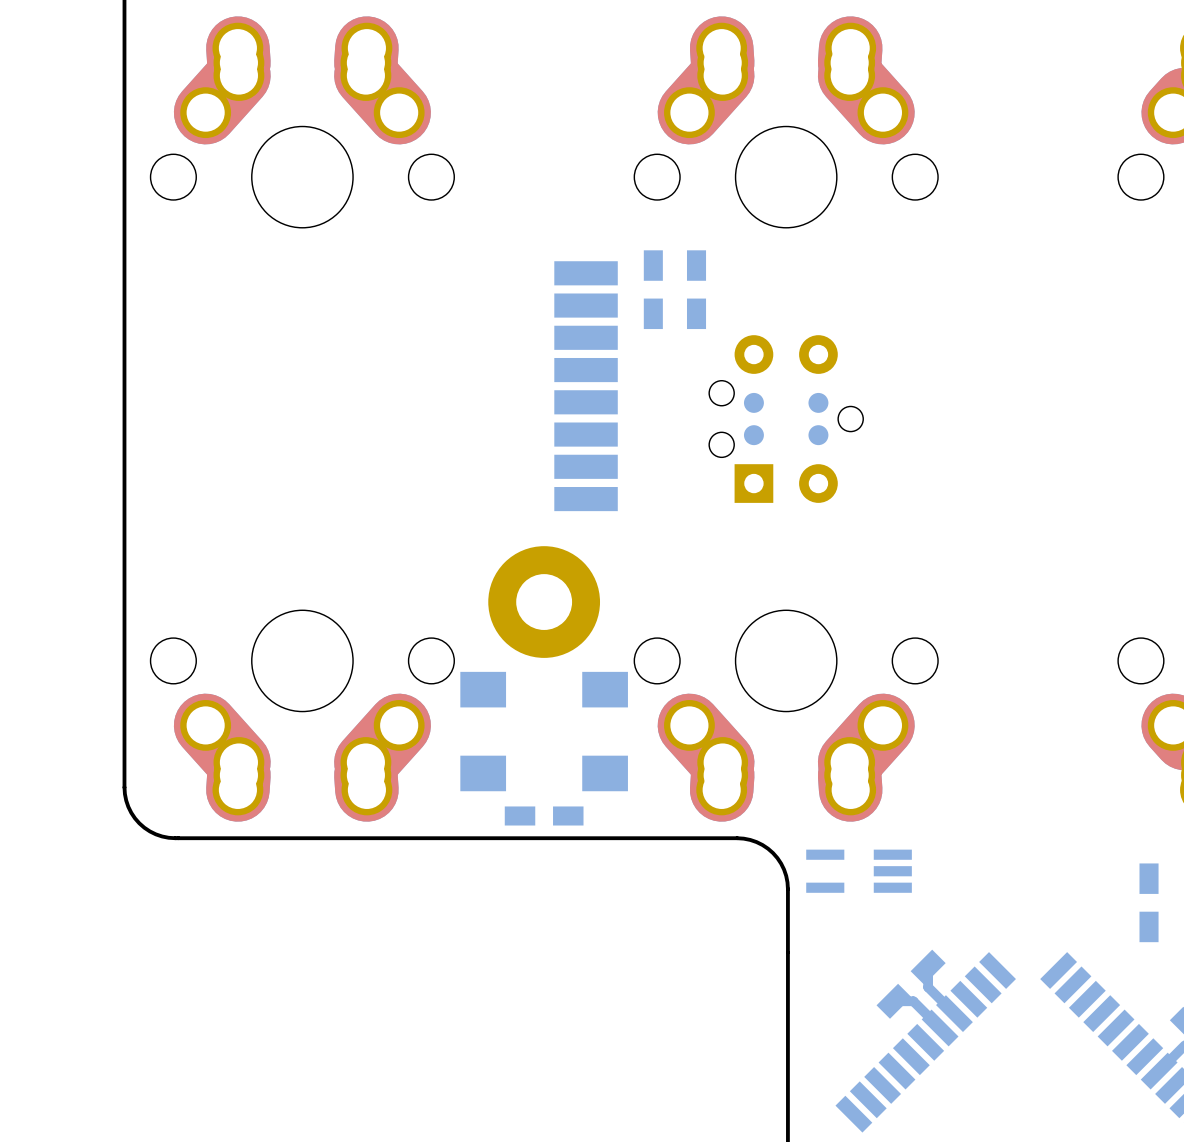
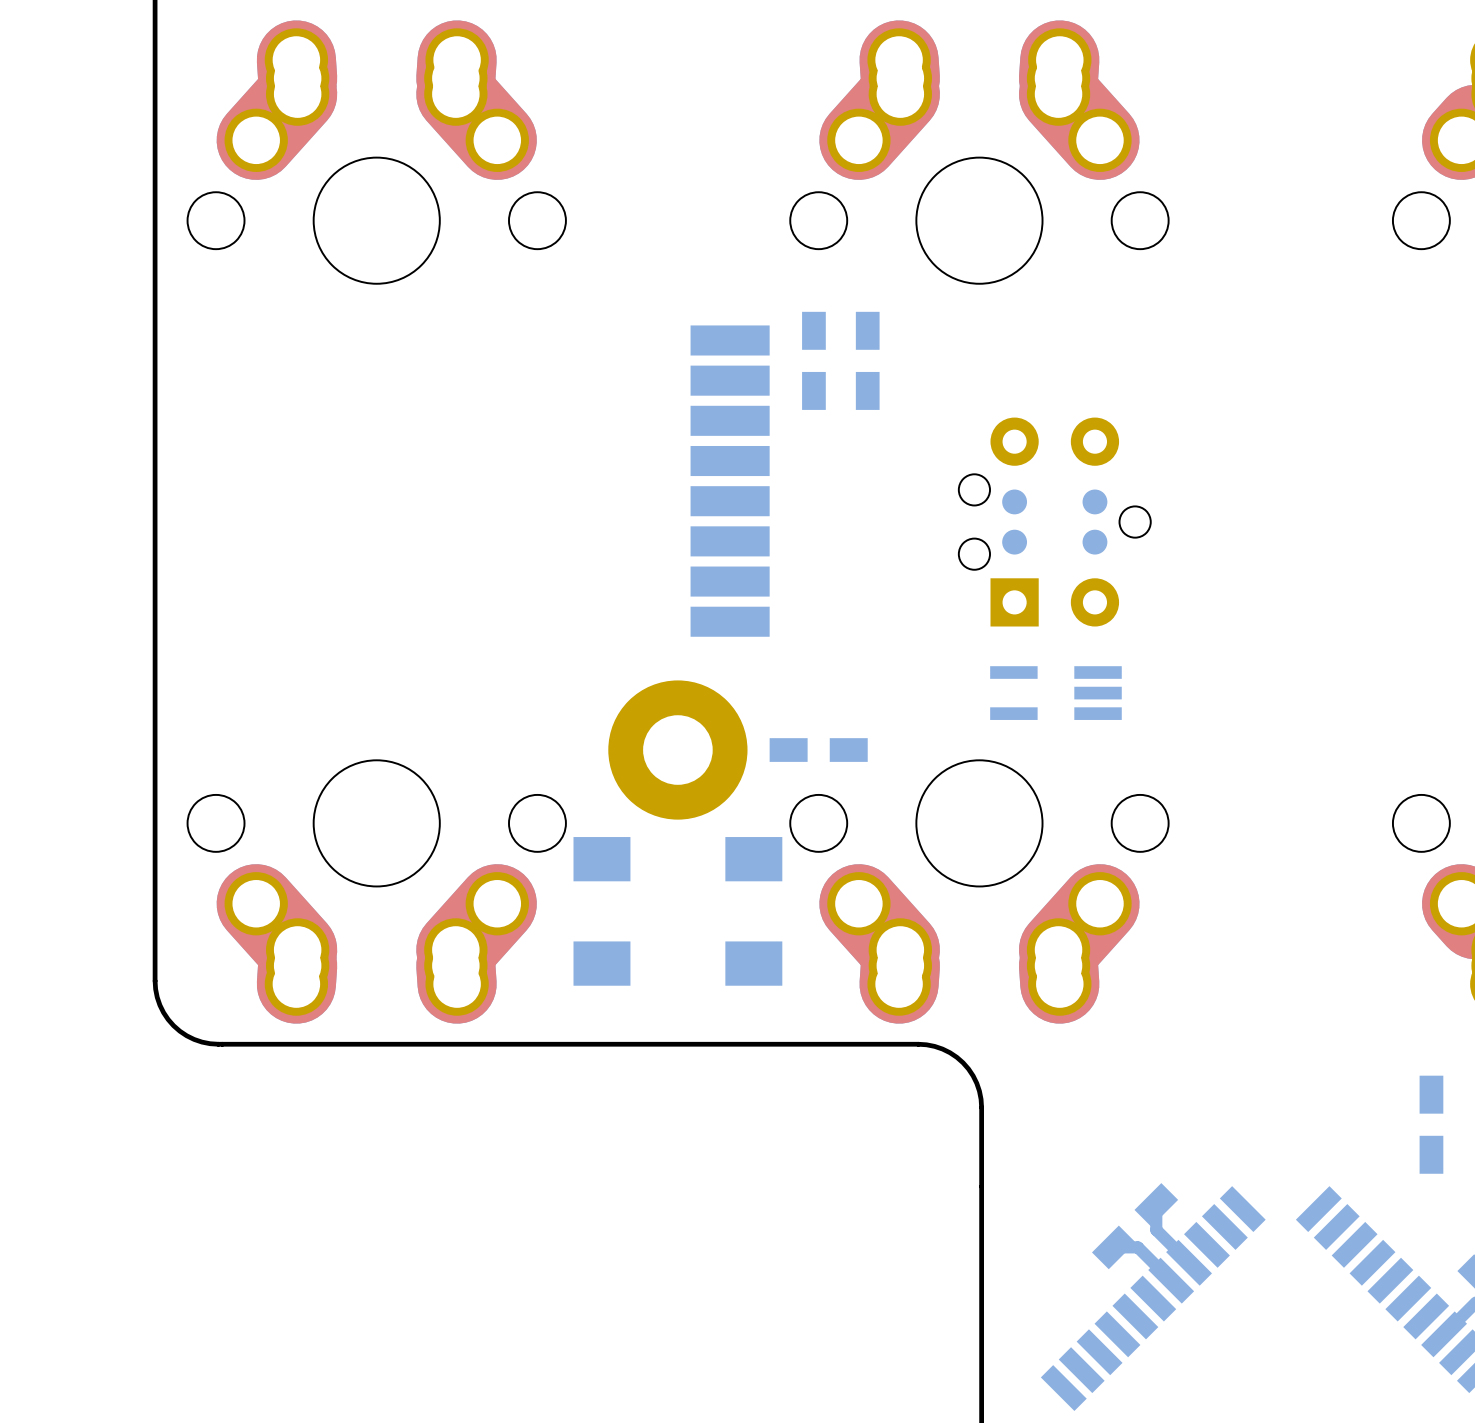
part position: (786, 419) -> (1054, 522)
part position: (544, 815) -> (818, 750)
part position: (859, 871) -> (1055, 693)

